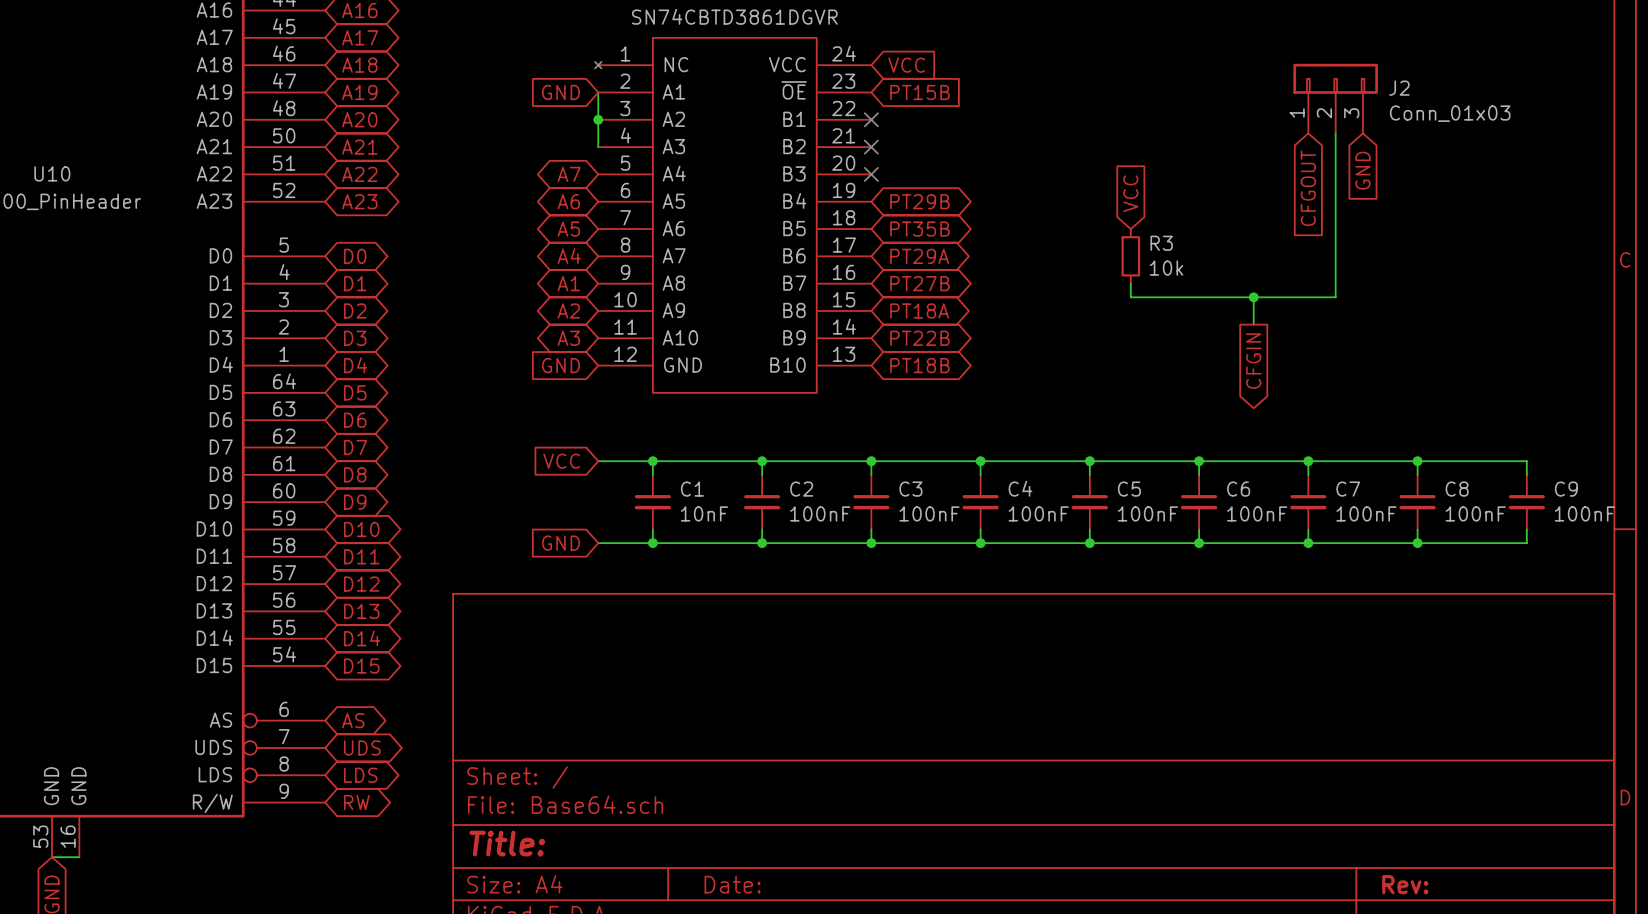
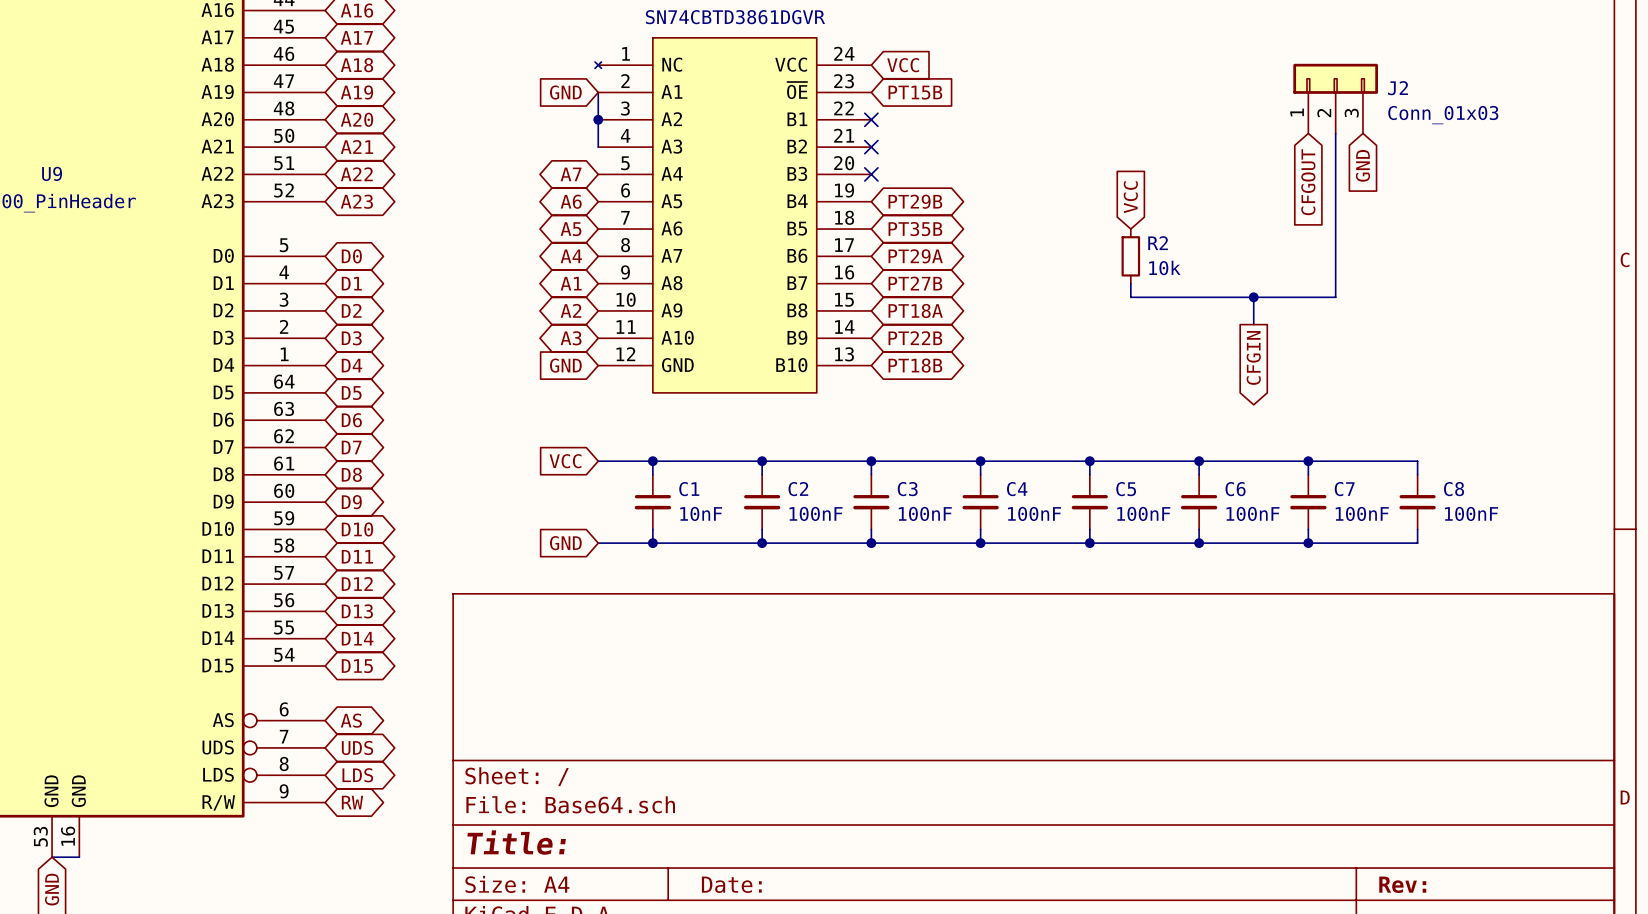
U10 name: U10 (52, 173) -> U9 (52, 173)
R3 name: R3 (1161, 243) -> R2 (1158, 243)
wire: (1417, 461) (1526, 461) (1526, 474) -> none
junction: (1417, 461) -> none
C9: 100nF (1526, 502) -> none
wire: (1526, 529) (1526, 543) (1417, 543) -> none
junction: (1417, 543) -> none

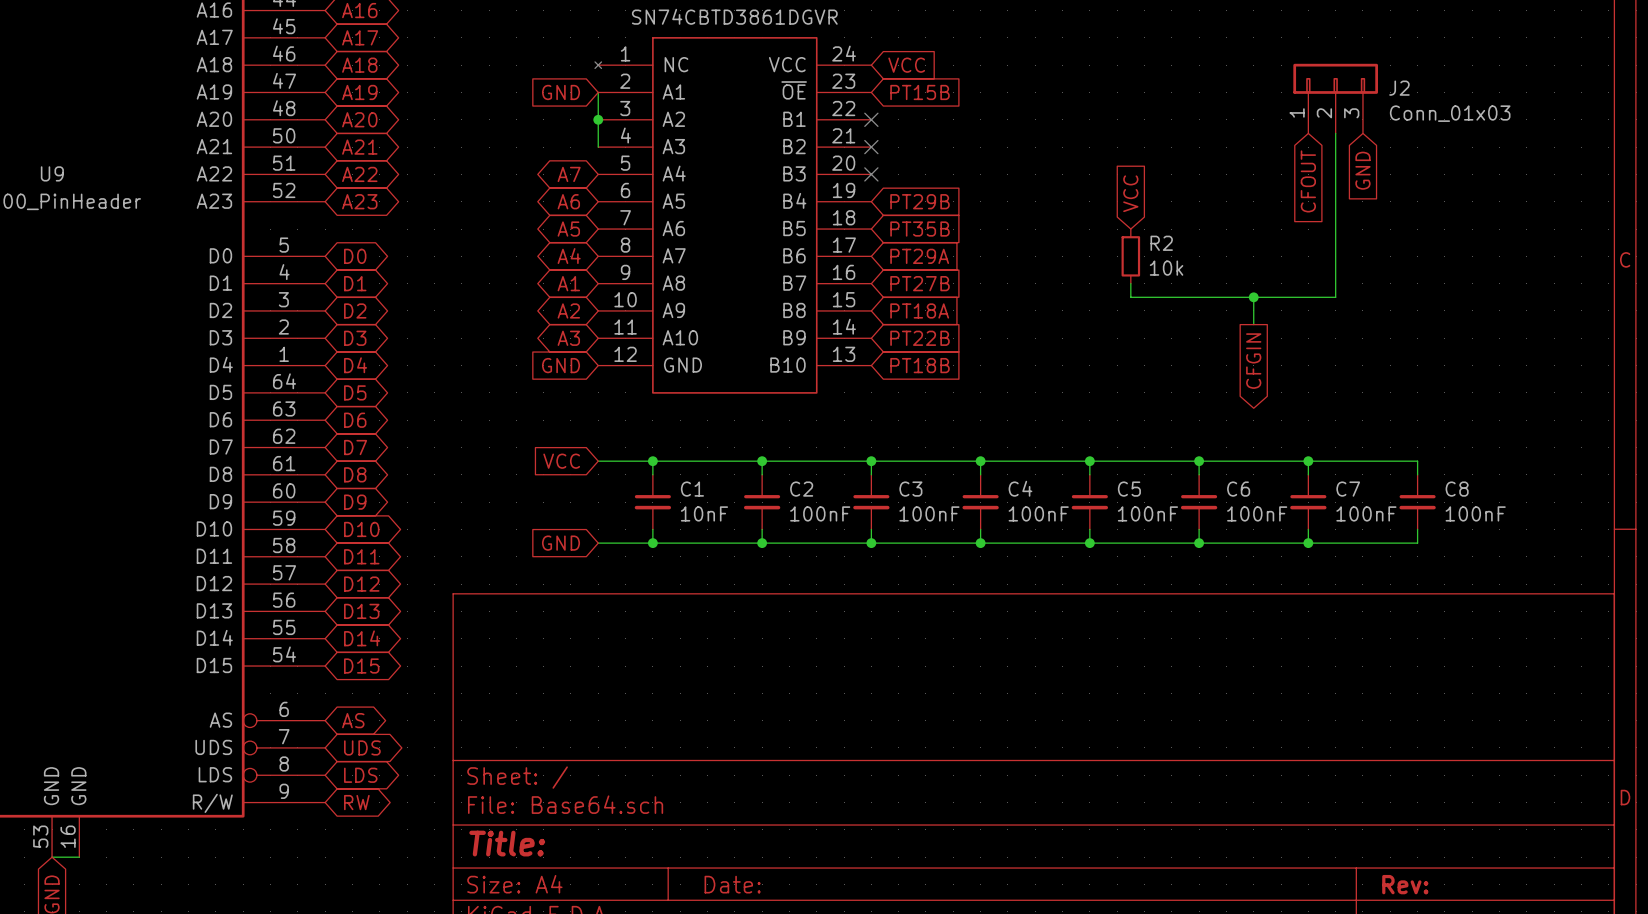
global label: CFGOUT (1308, 182) -> CFOUT (1308, 181)
global label shape: bidirectional (915, 201) -> input (920, 201)
global label shape: bidirectional (915, 229) -> input (920, 229)
global label shape: bidirectional (915, 256) -> input (919, 256)
global label shape: bidirectional (915, 283) -> input (920, 283)
global label shape: bidirectional (915, 310) -> input (919, 310)
global label shape: bidirectional (915, 338) -> input (920, 338)
global label shape: bidirectional (915, 365) -> input (920, 365)

